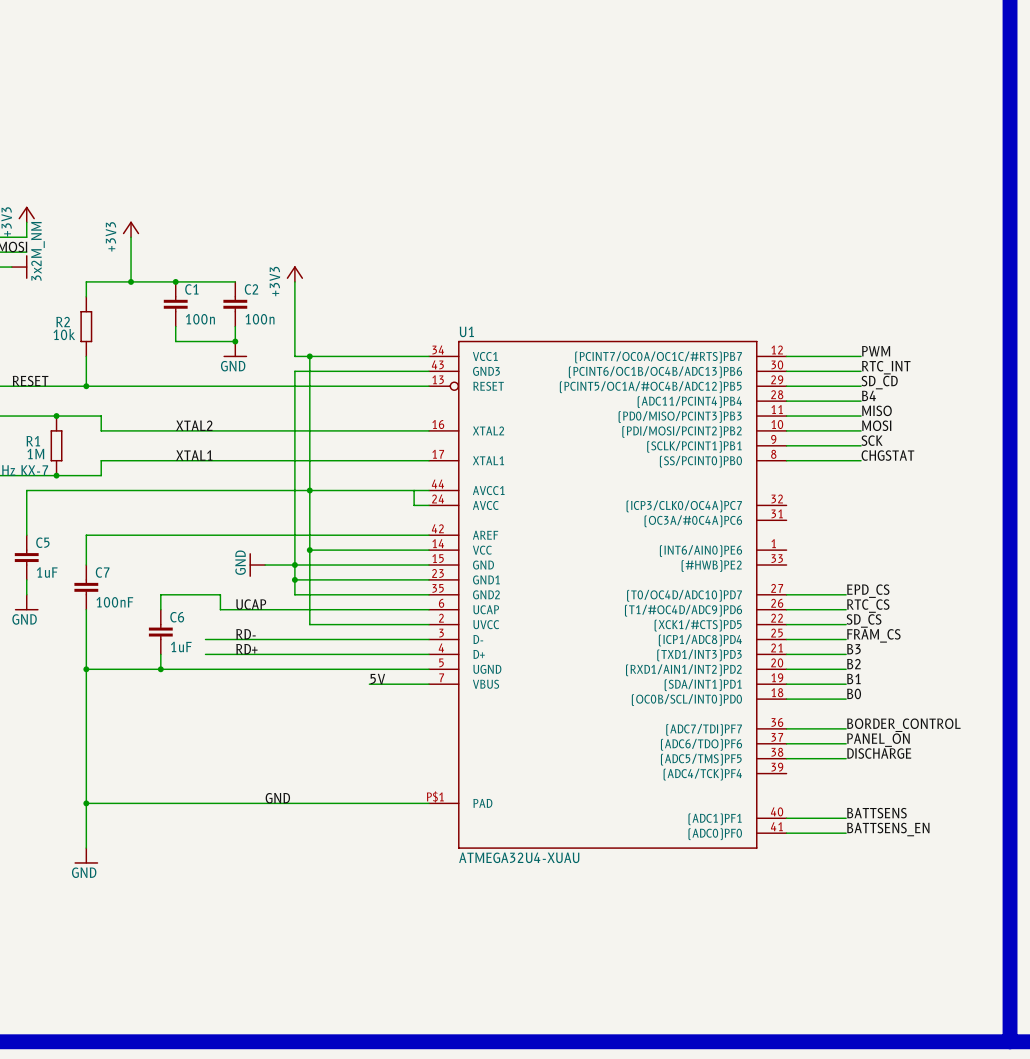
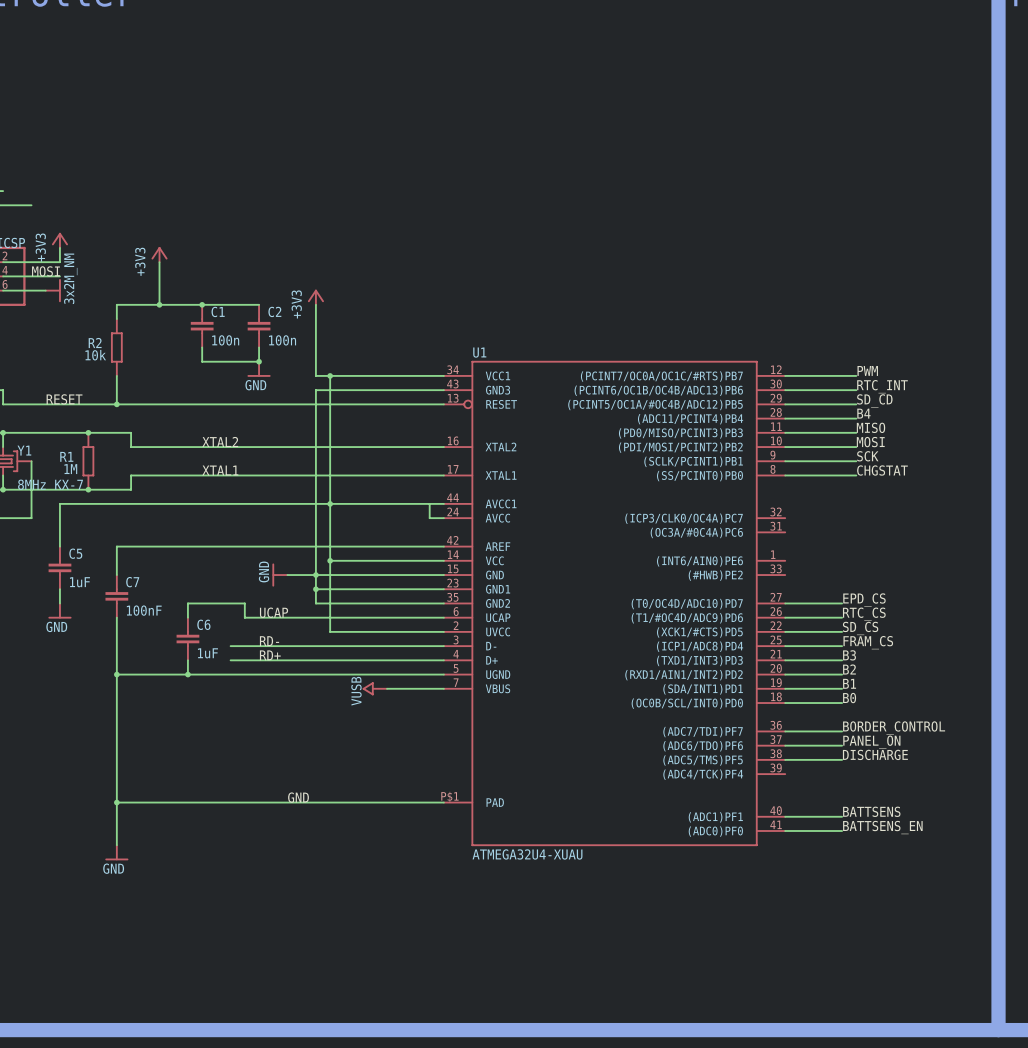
label: 5V (377, 679) -> none
power symbol: none -> VUSB (374, 688)

